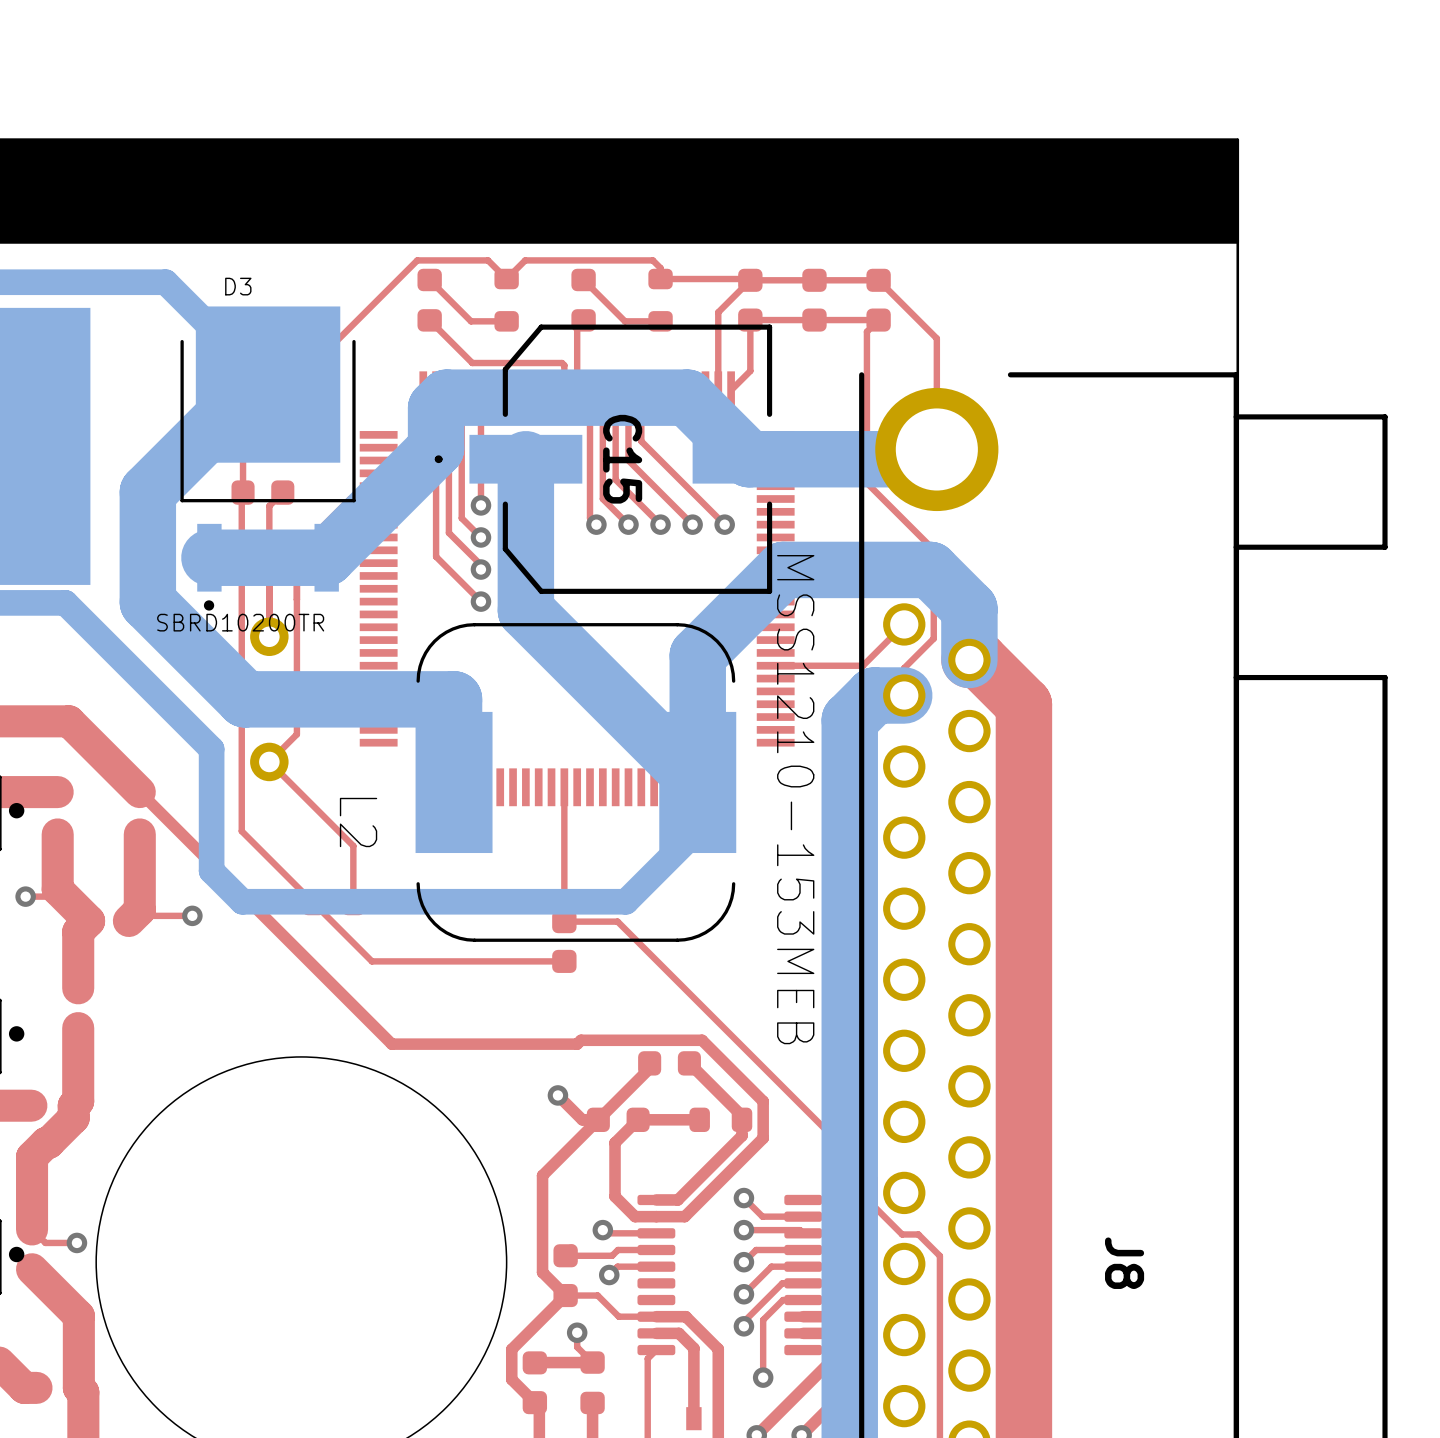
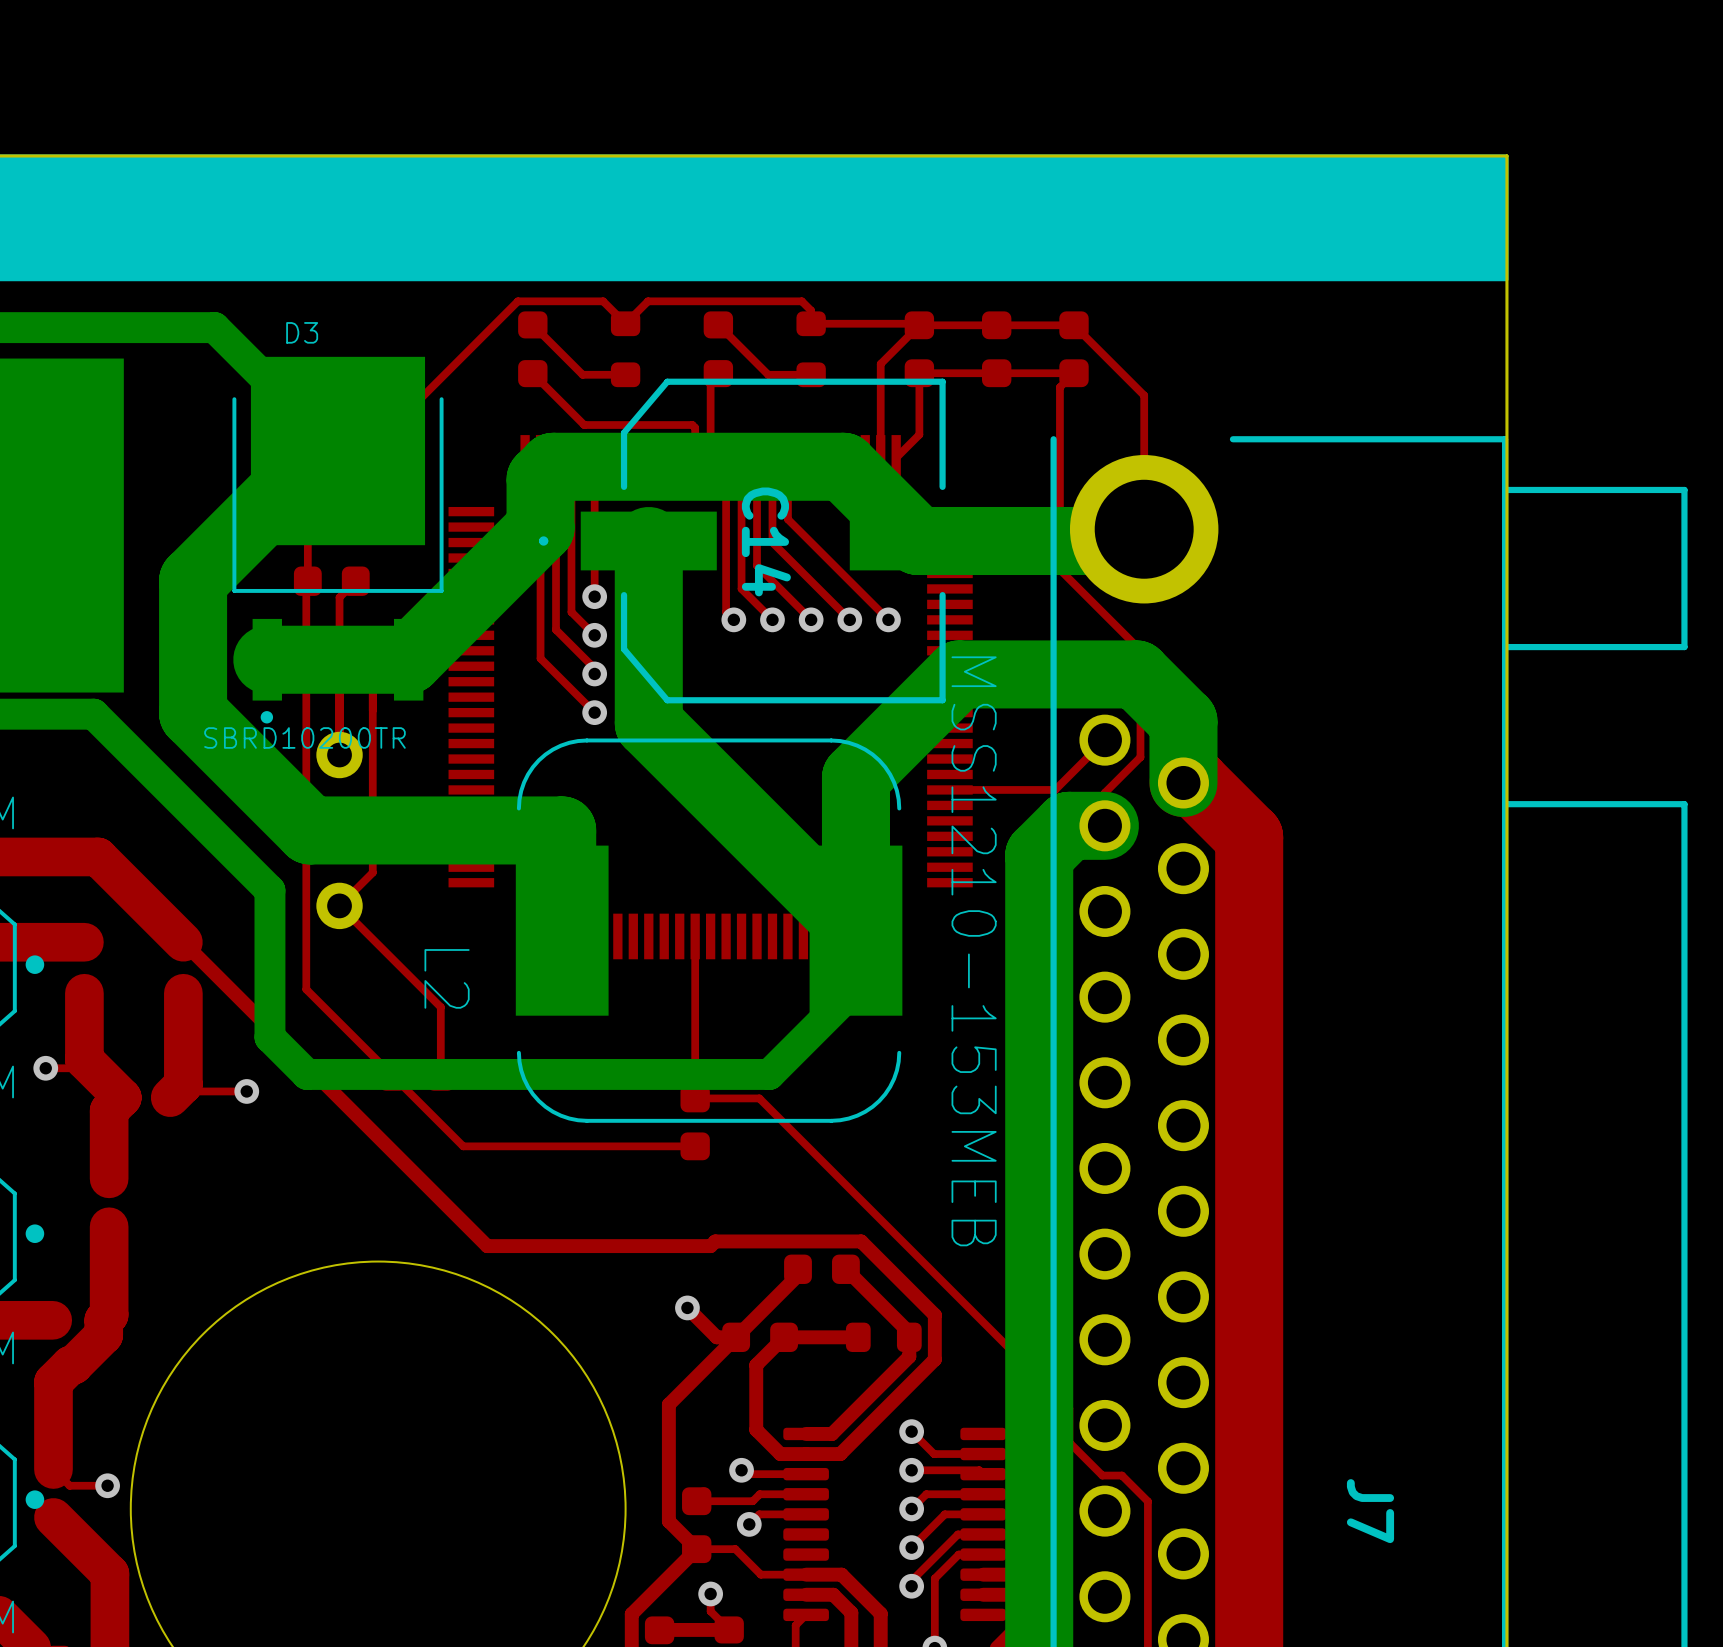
C15 name: C15 (622, 459) -> C14 (766, 541)
J8 name: J8 (1124, 1263) -> J7 (1370, 1511)

